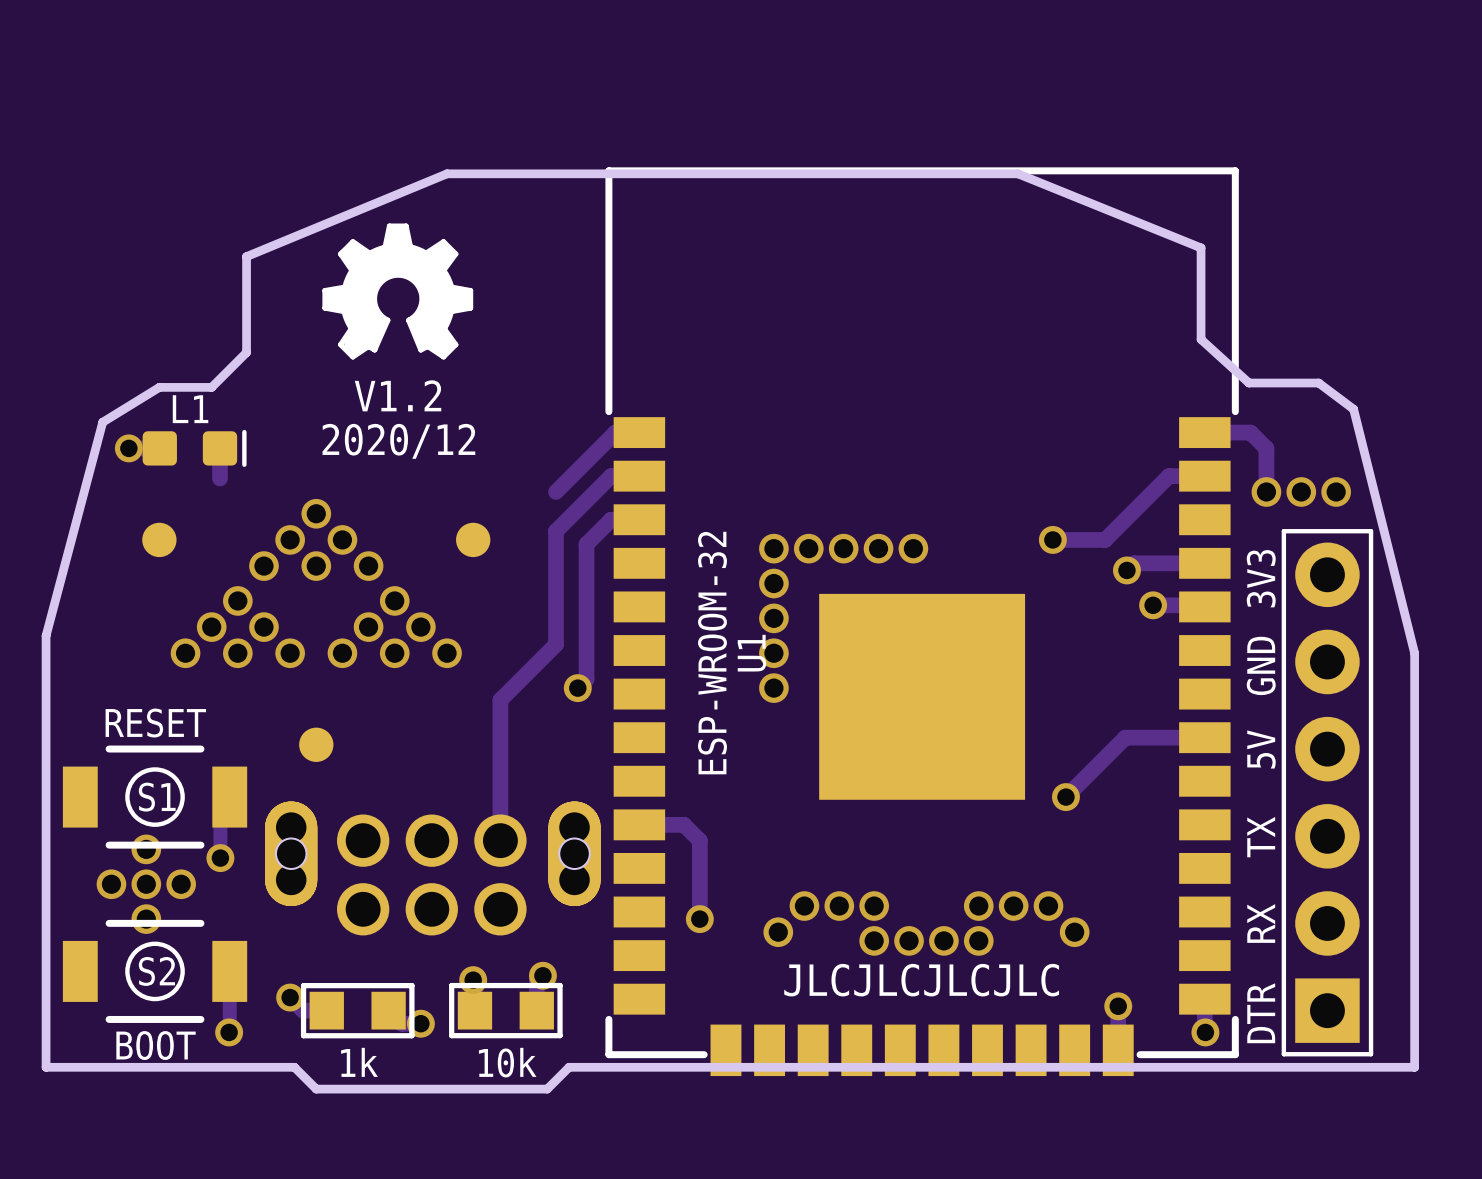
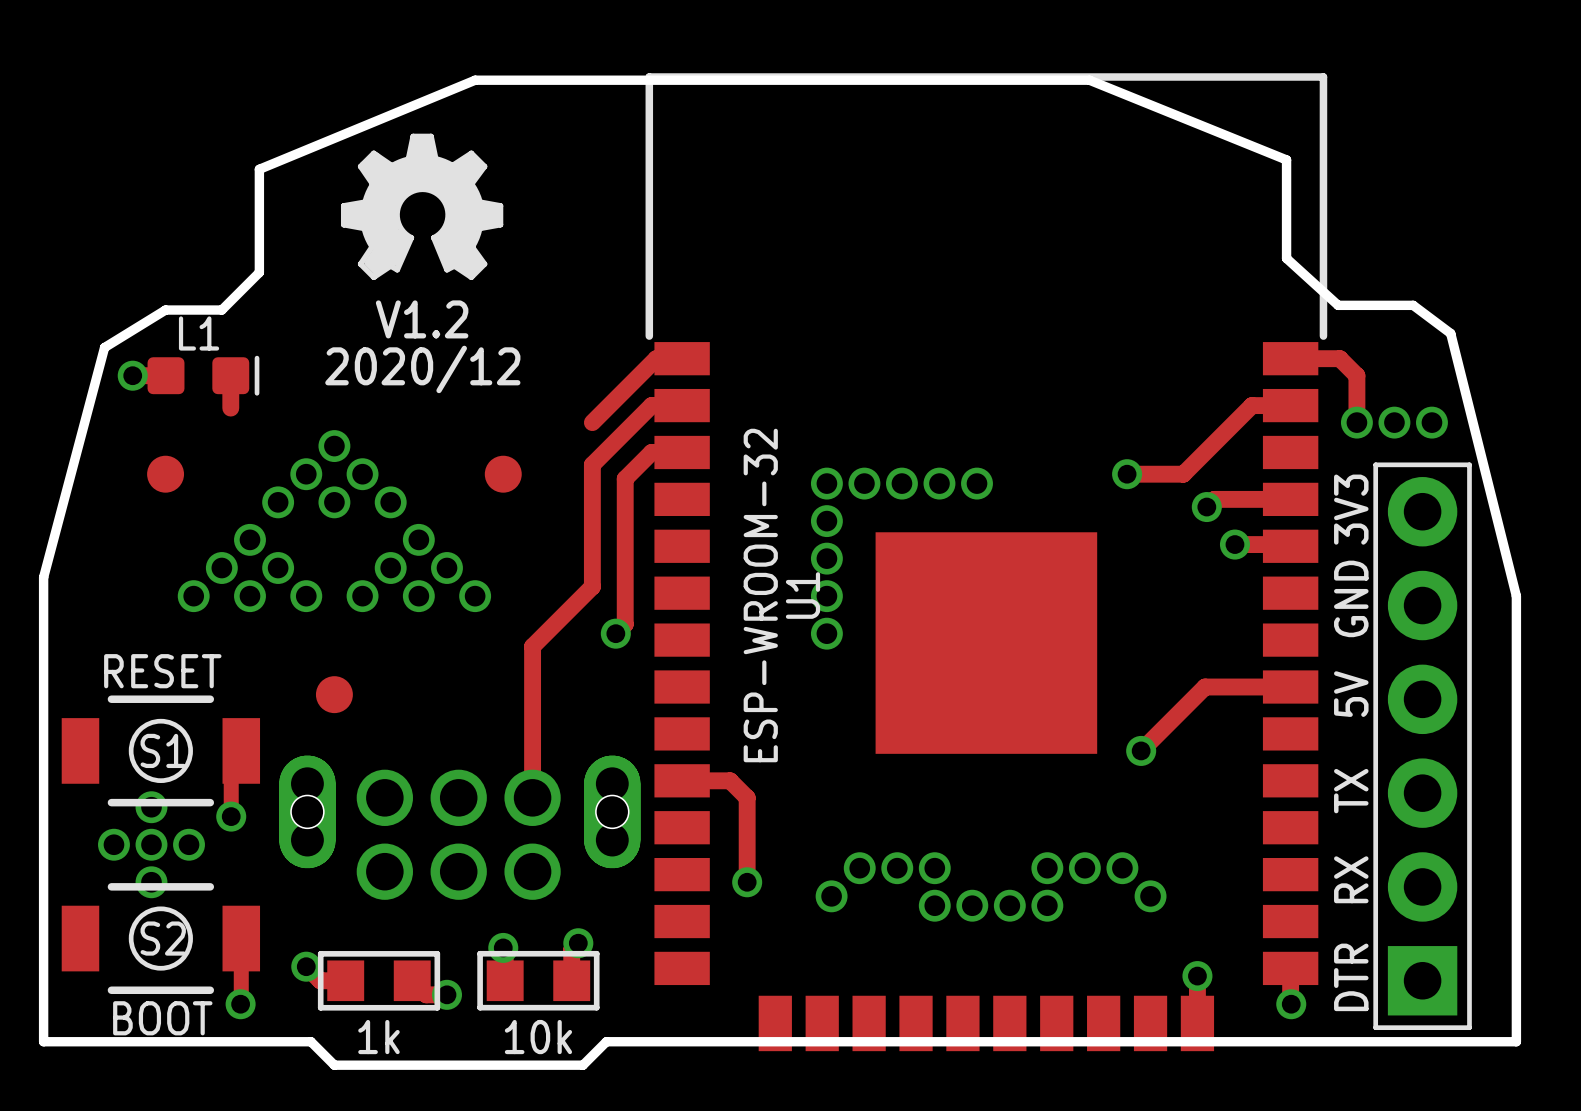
U1 footprint: [605, 167, 1239, 1077] -> [645, 73, 1328, 1052]
text: JLCJLCJLCJLC (921, 980) -> none

